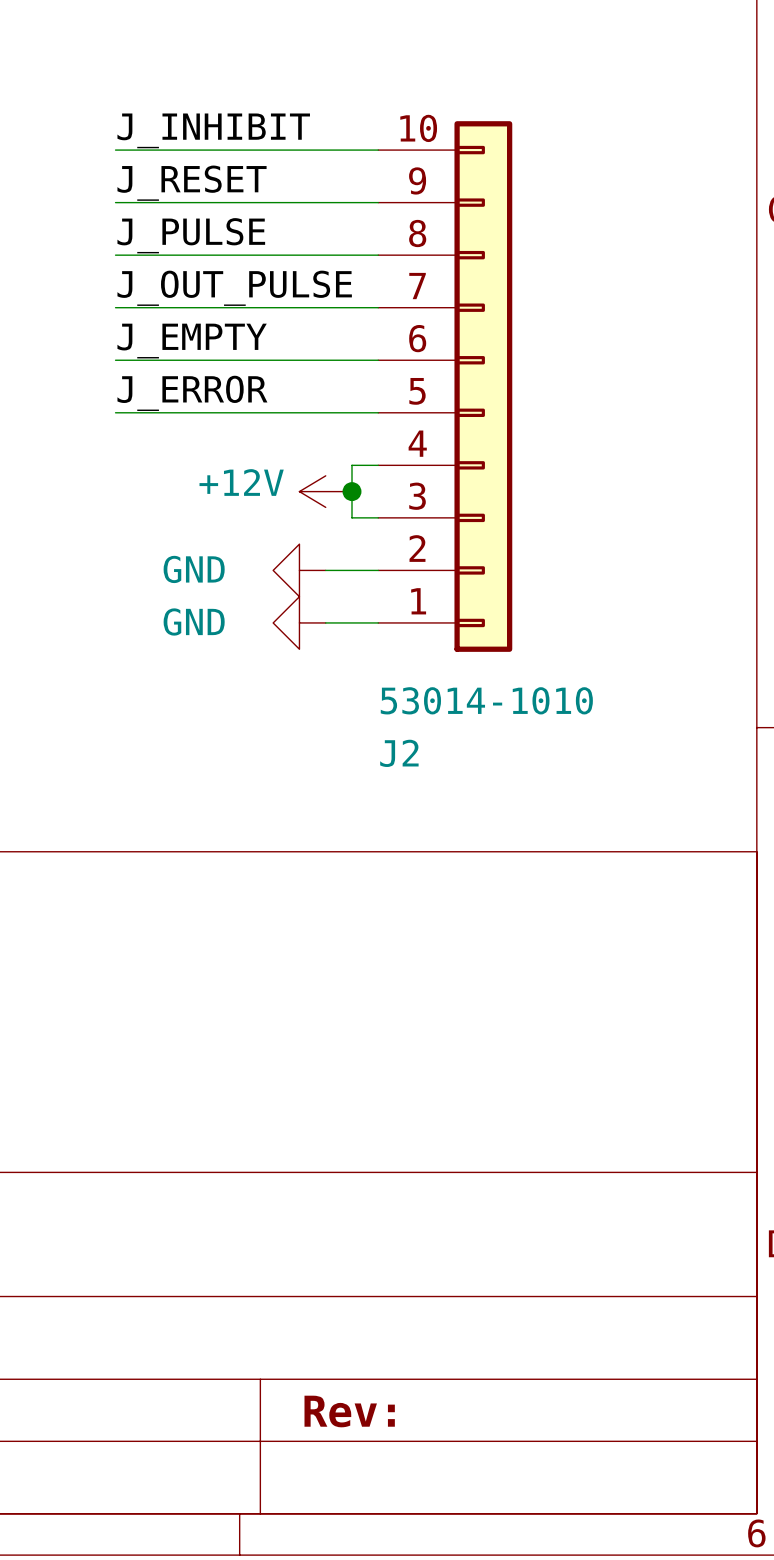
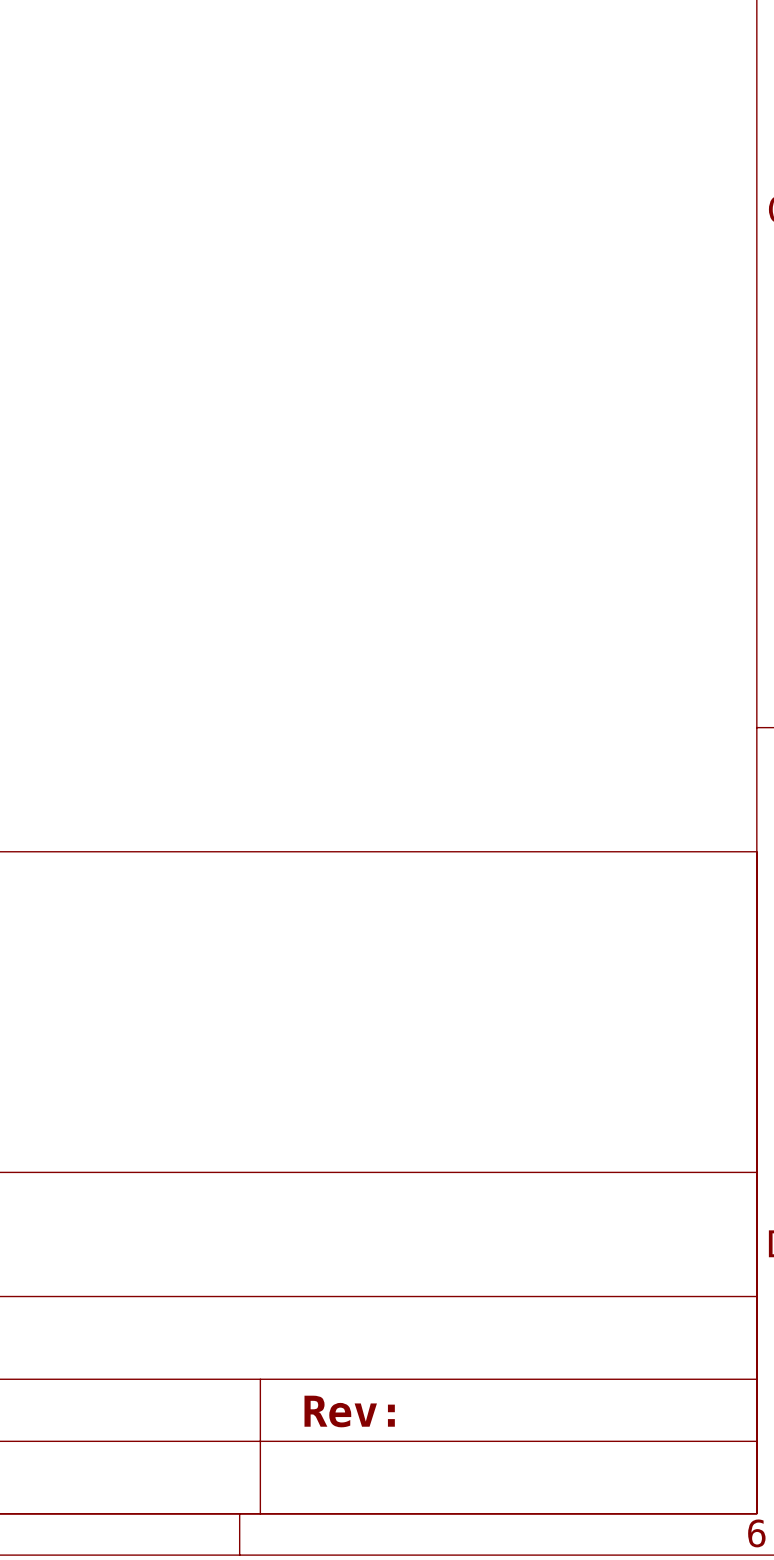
label: J_INHIBIT (213, 130) -> none
wire: (115, 150) (378, 150) -> none
label: J_RESET (192, 183) -> none
wire: (115, 202) (378, 202) -> none
label: J_PULSE (191, 235) -> none
wire: (115, 255) (378, 255) -> none
label: J_OUT_PULSE (234, 288) -> none
wire: (115, 307) (378, 307) -> none
label: J_EMPTY (192, 341) -> none
wire: (115, 360) (378, 360) -> none
J2: 53014-1010 (445, 386) -> none
label: J_ERROR (192, 393) -> none
wire: (115, 412) (378, 412) -> none
wire: (378, 465) (352, 465) (352, 517) (378, 517) -> none
power symbol: +12V (325, 491) -> none
junction: (352, 491) -> none
power symbol: GND (299, 570) -> none
wire: (325, 570) (378, 570) -> none
power symbol: GND (299, 622) -> none
wire: (325, 622) (378, 622) -> none

